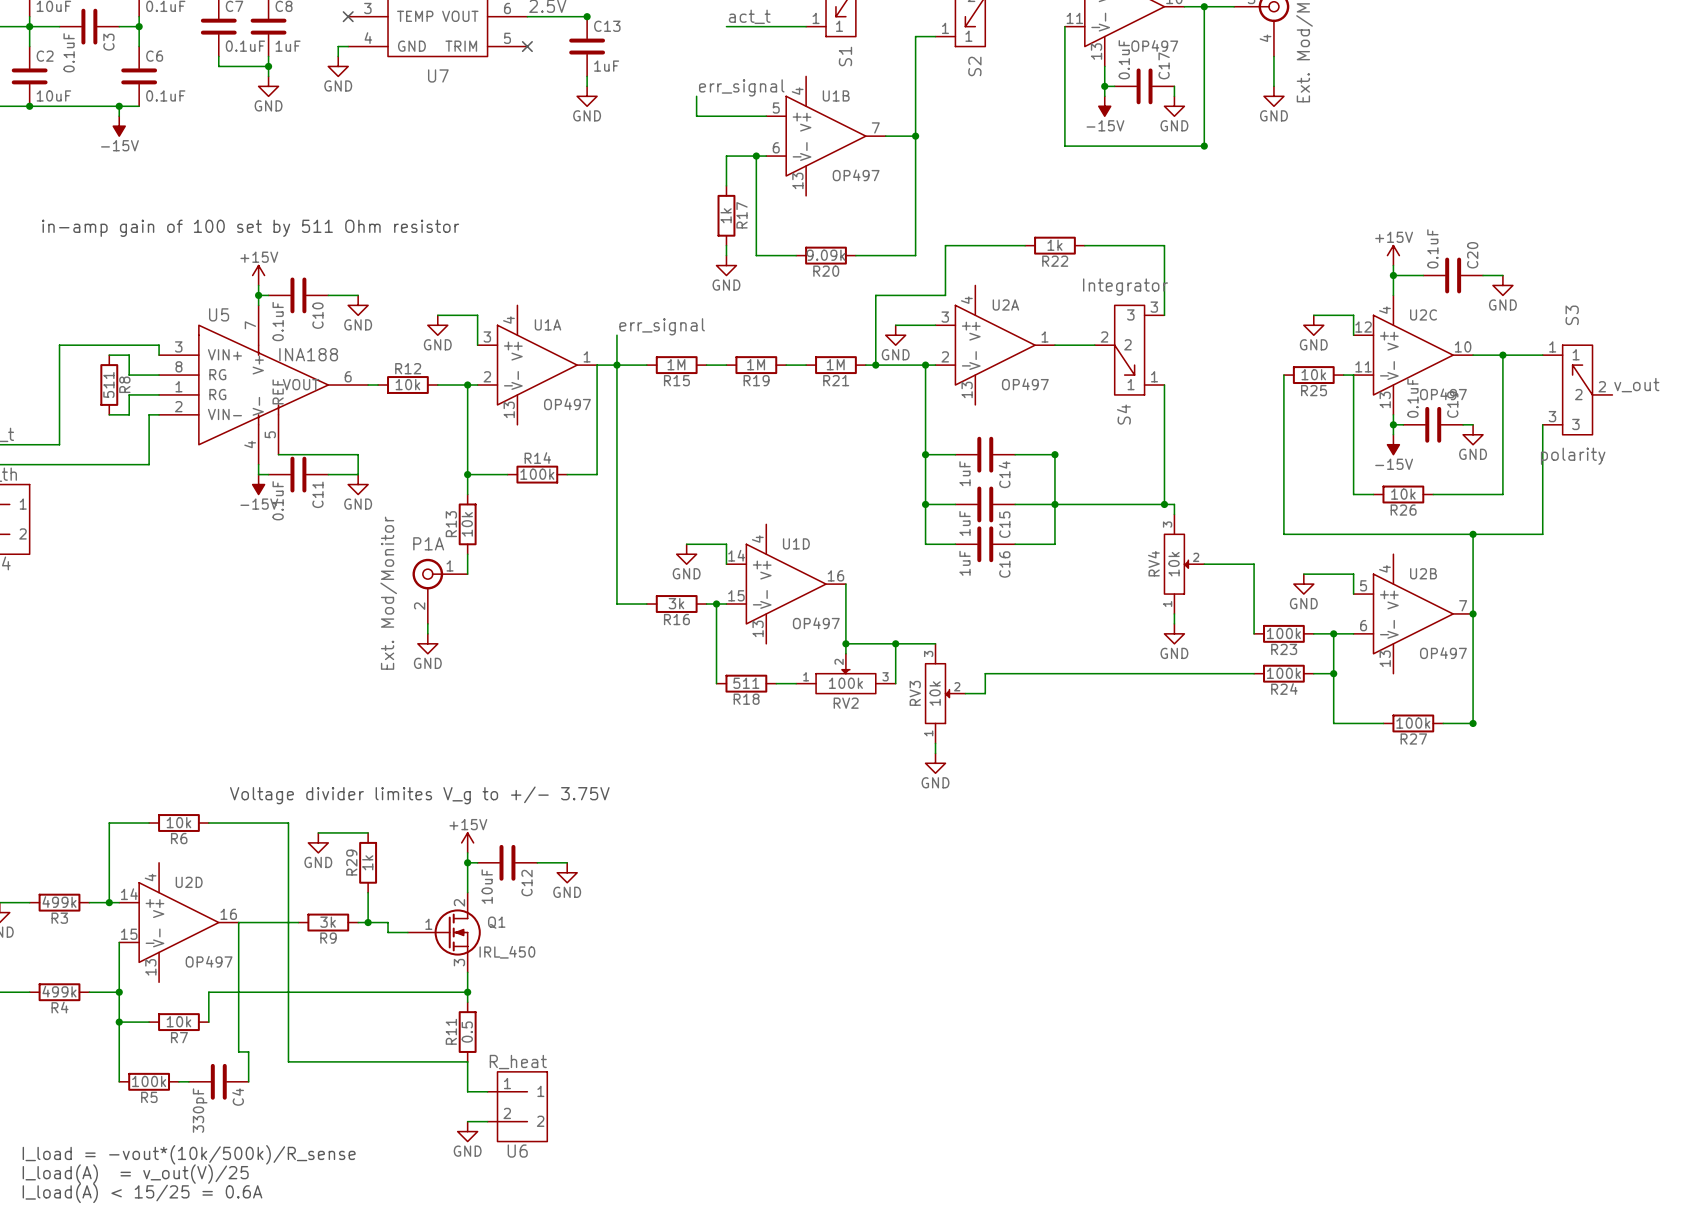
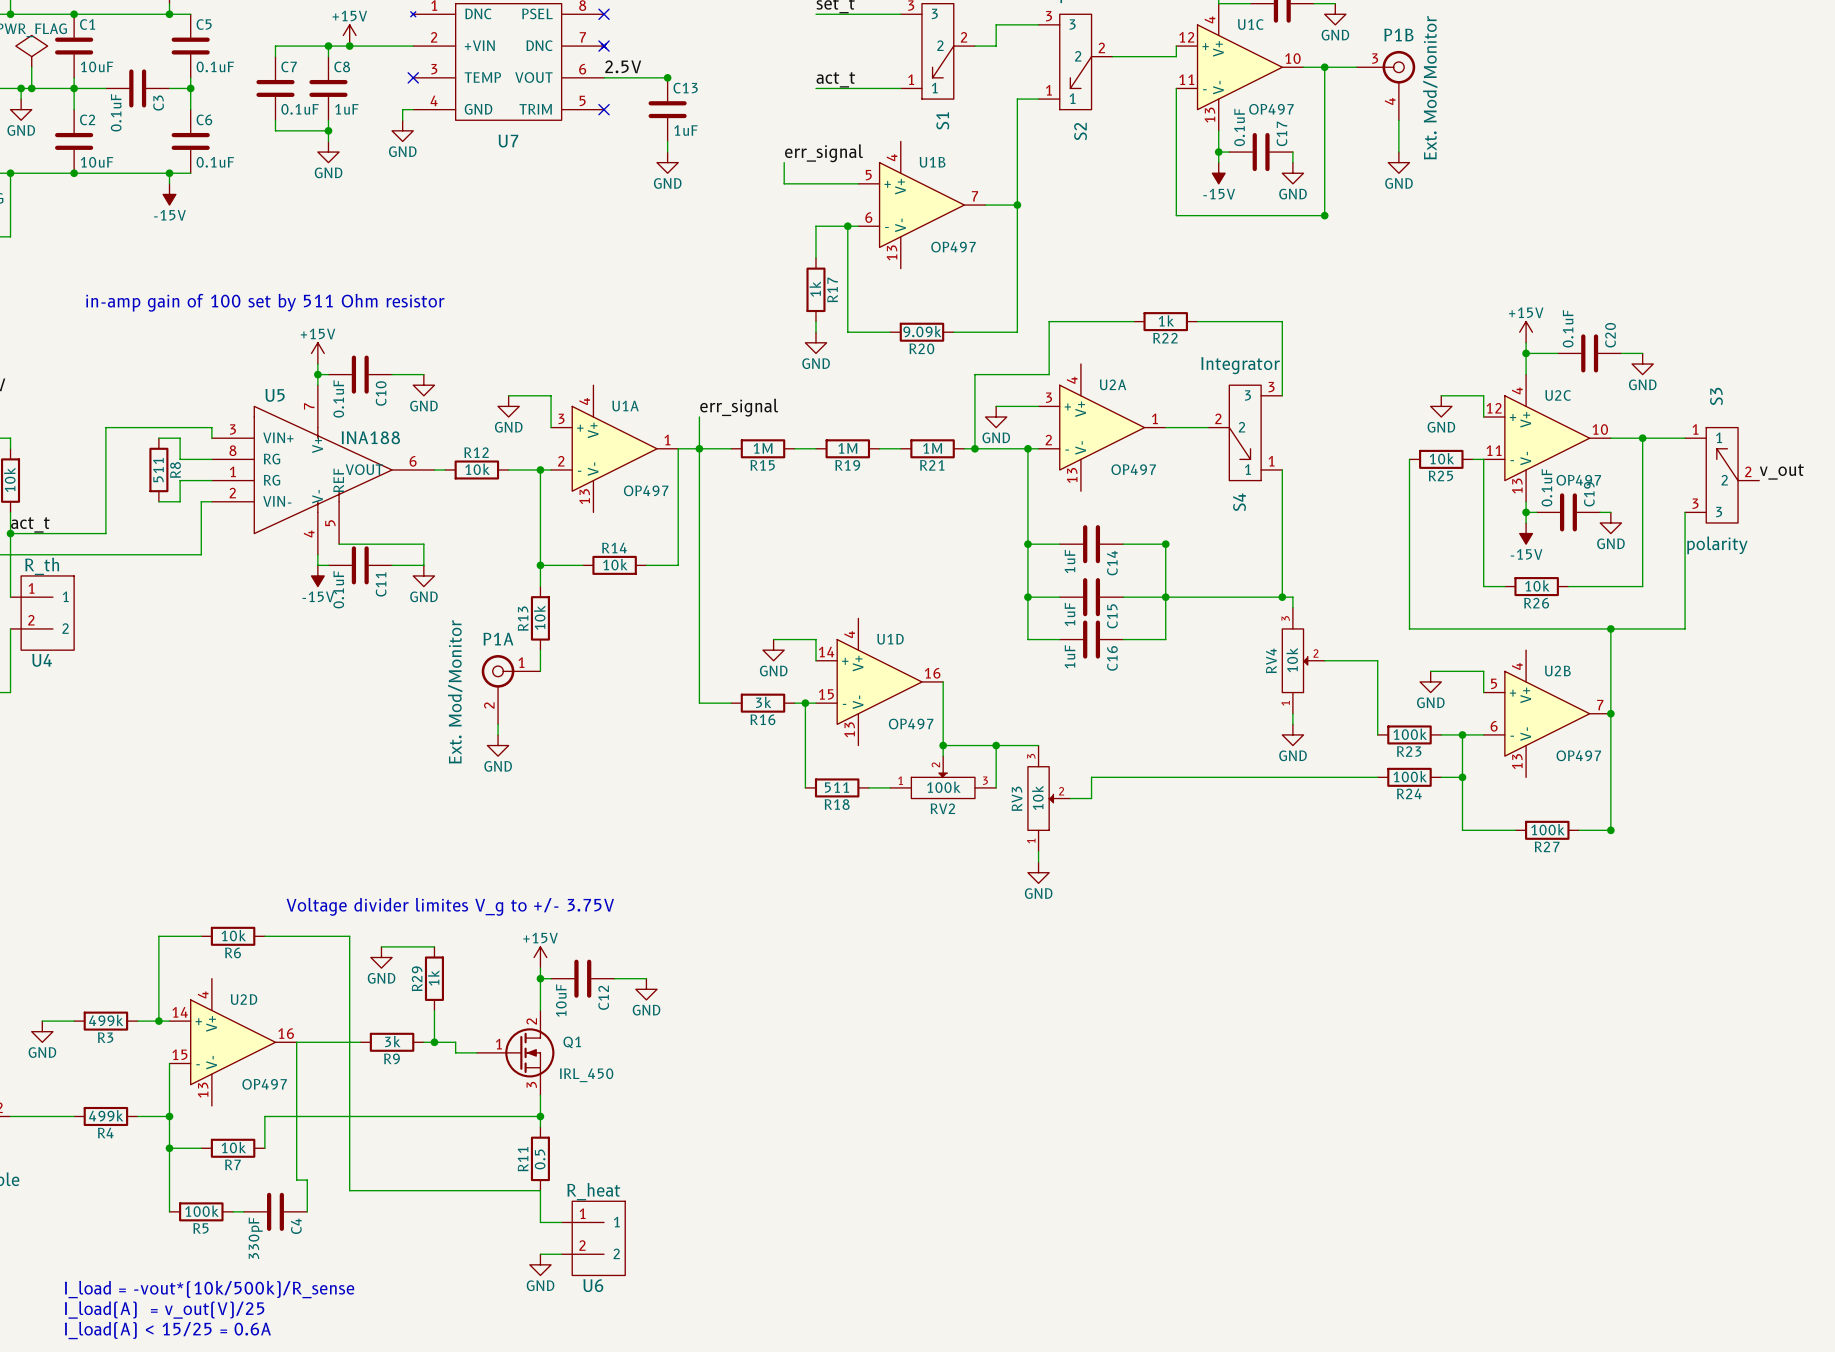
R14 value: 100k (537, 474) -> 10k (615, 564)

